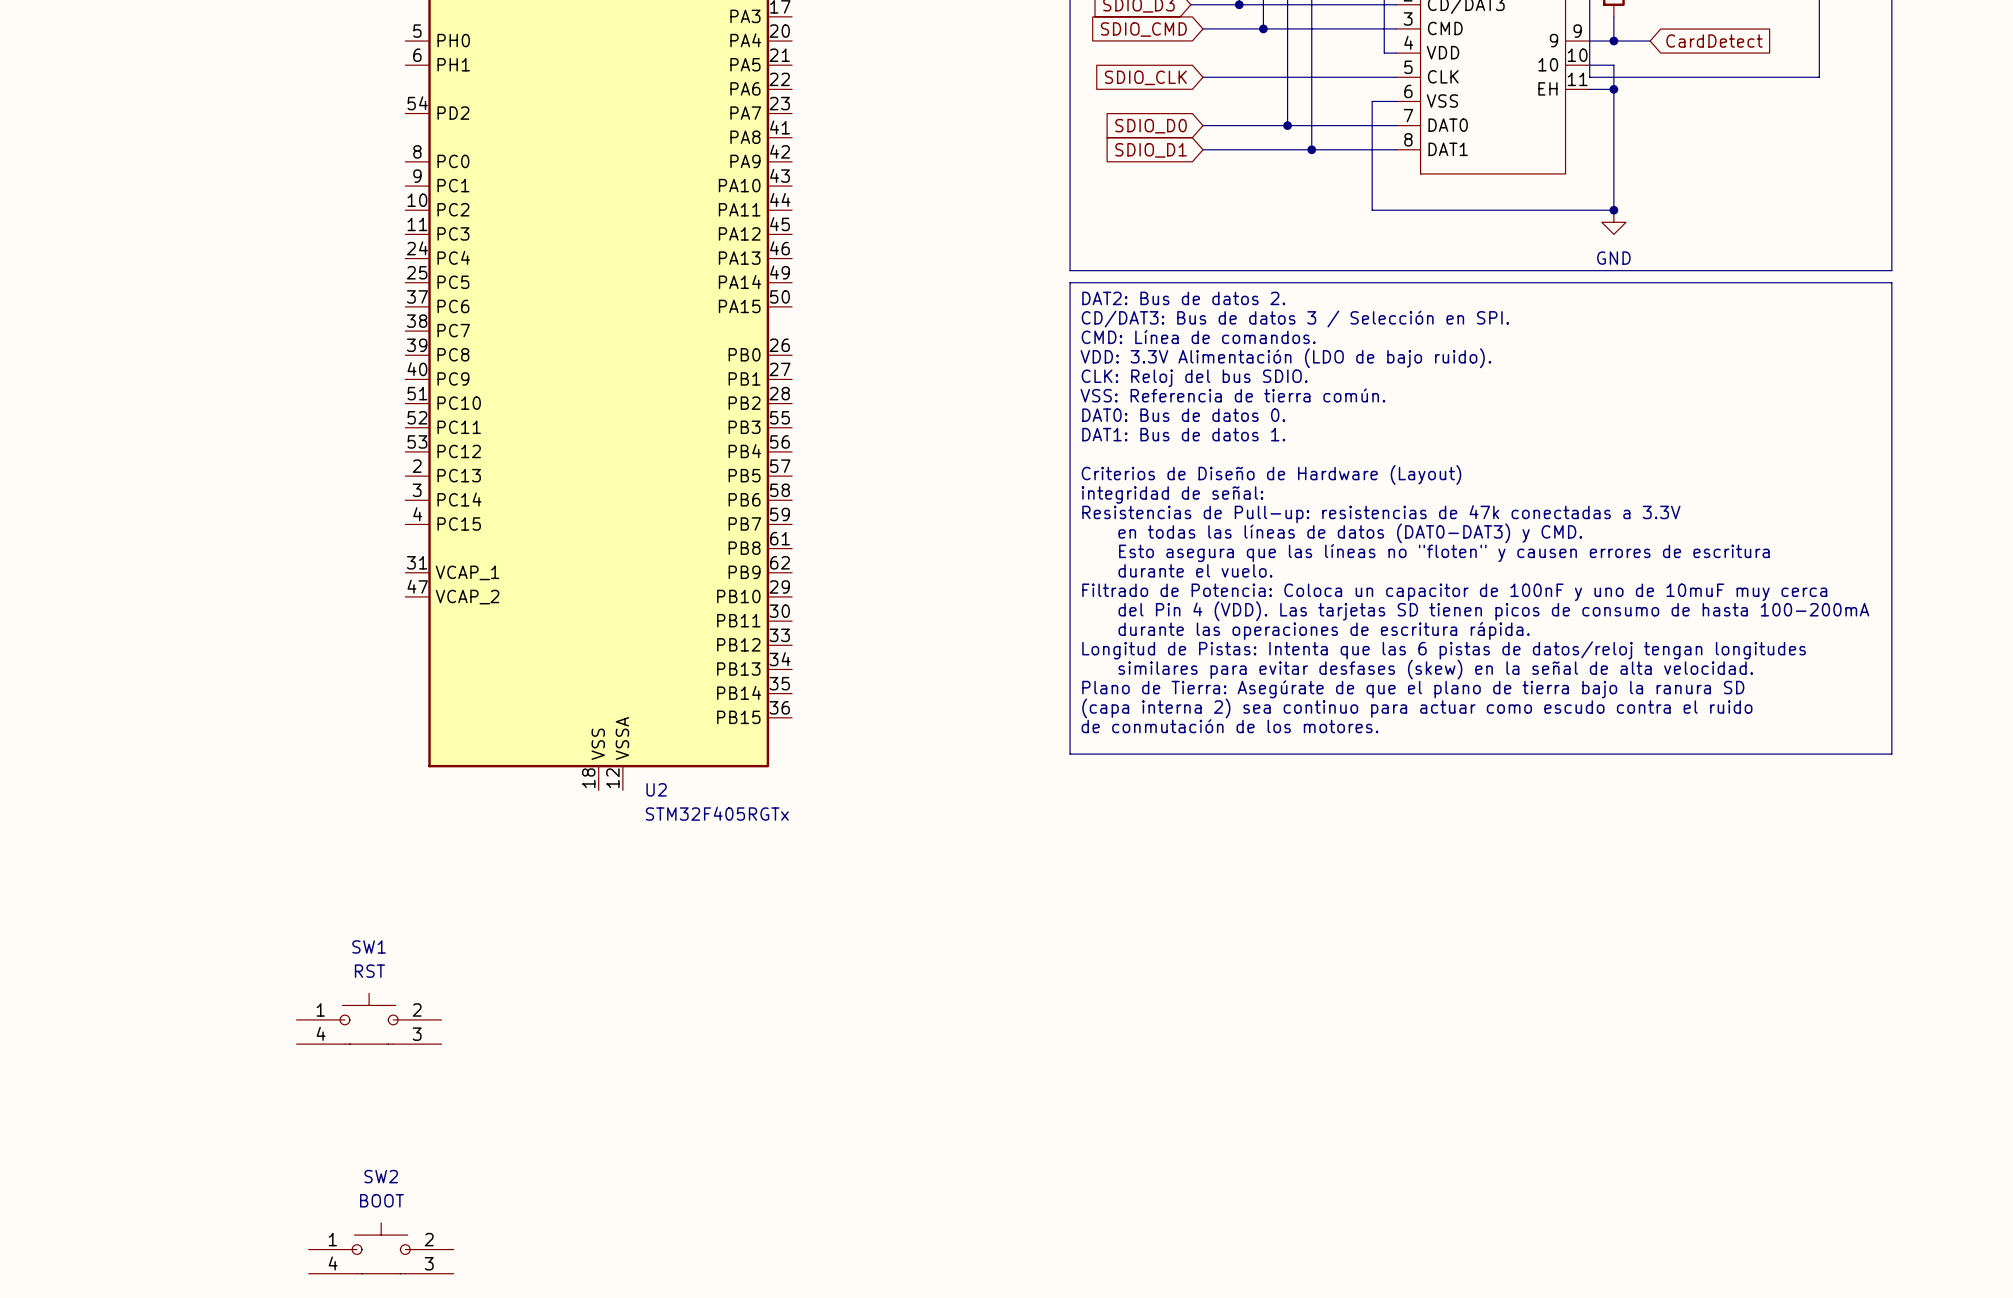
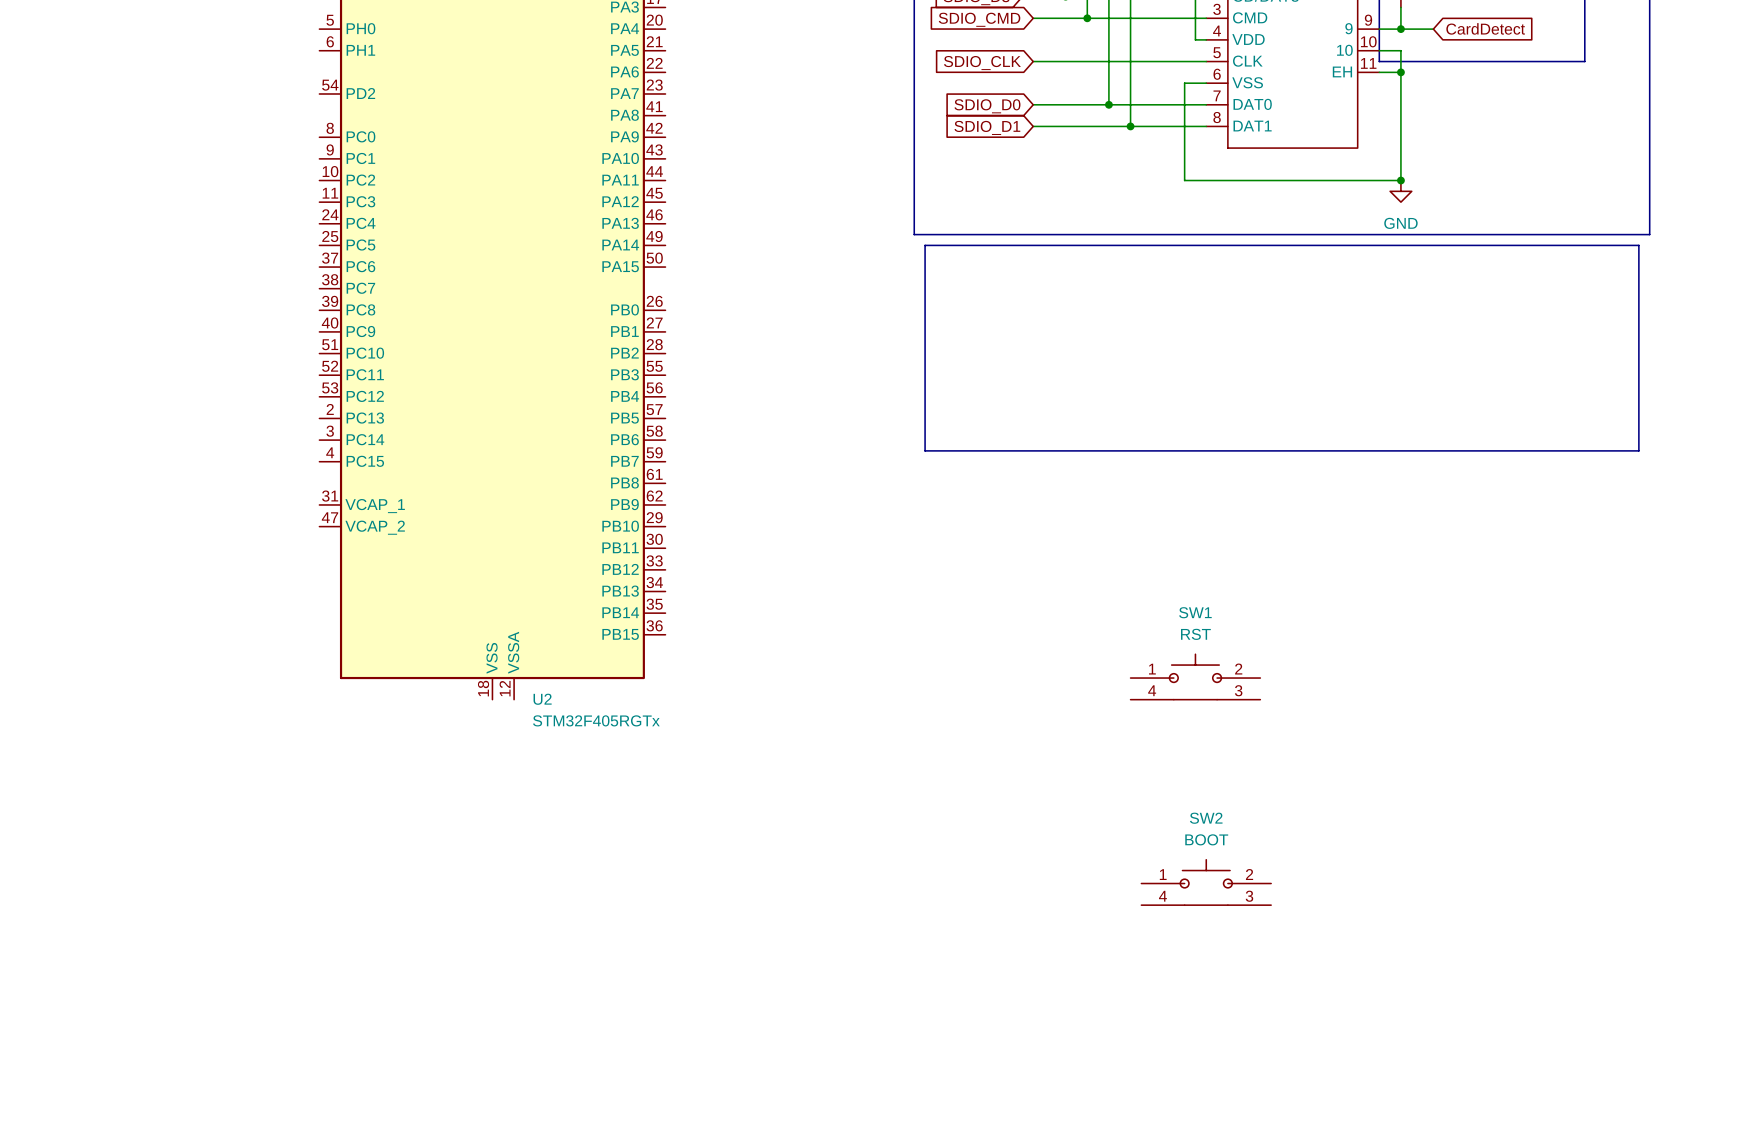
line: (1082, 282) (1070, 282) (1070, 754) (1891, 754) (1891, 282) (1879, 282) -> (925, 245) (925, 450) (1638, 450) (1638, 245)
text: DAT2: Bus de datos 2. (1183, 298) -> none
text: CD/DAT3: Bus de datos 3 / Selección en SPI. (1295, 319) -> none
text: CMD: Línea de comandos. (1198, 337) -> none
text: VDD: 3.3V Alimentación (LDO de bajo ruido). (1285, 358) -> none
text: CLK: Reloj del bus SDIO. (1194, 378) -> none
text: VSS: Referencia de tierra común. (1232, 395) -> none
text: DAT0: Bus de datos 0. (1183, 415) -> none
text: DAT1: Bus de datos 1. (1183, 434) -> none
text: Criterios de Diseño de Hardware (Layout) (1271, 474) -> none
text: integridad de señal: (1172, 495) -> none
text: Resistencias de Pull-up: resistencias de 47k conectadas a 3.3V (1381, 514) -> none
text: en todas las líneas de datos (DAT0-DAT3) y CMD. (1350, 533) -> none
text: Esto asegura que las líneas no "floten" y causen errores de escritura (1444, 553) -> none
text: durante el vuelo. (1195, 570) -> none
text: Filtrado de Potencia: Coloca un capacitor de 100nF y uno de 10muF muy cerca (1454, 592) -> none
text: del Pin 4 (VDD). Las tarjetas SD tienen picos de consumo de hasta 100-200mA (1493, 611) -> none
text: durante las operaciones de escritura rápida. (1324, 630) -> none
text: Longitud de Pistas: Intenta que las 6 pistas de datos/reloj tengan longitudes (1444, 650) -> none
text: similares para evitar desfases (skew) en la señal de alta velocidad. (1435, 669) -> none
text: Plano de Tierra: Asegúrate de que el plano de tierra bajo la ranura SD (1413, 689) -> none
text: (capa interna 2) sea continuo para actuar como escudo contra el ruido (1417, 708) -> none
text: de conmutación de los motores. (1230, 726) -> none
SW1 position: (369, 1018) -> (1195, 676)
SW2 position: (381, 1248) -> (1206, 882)

